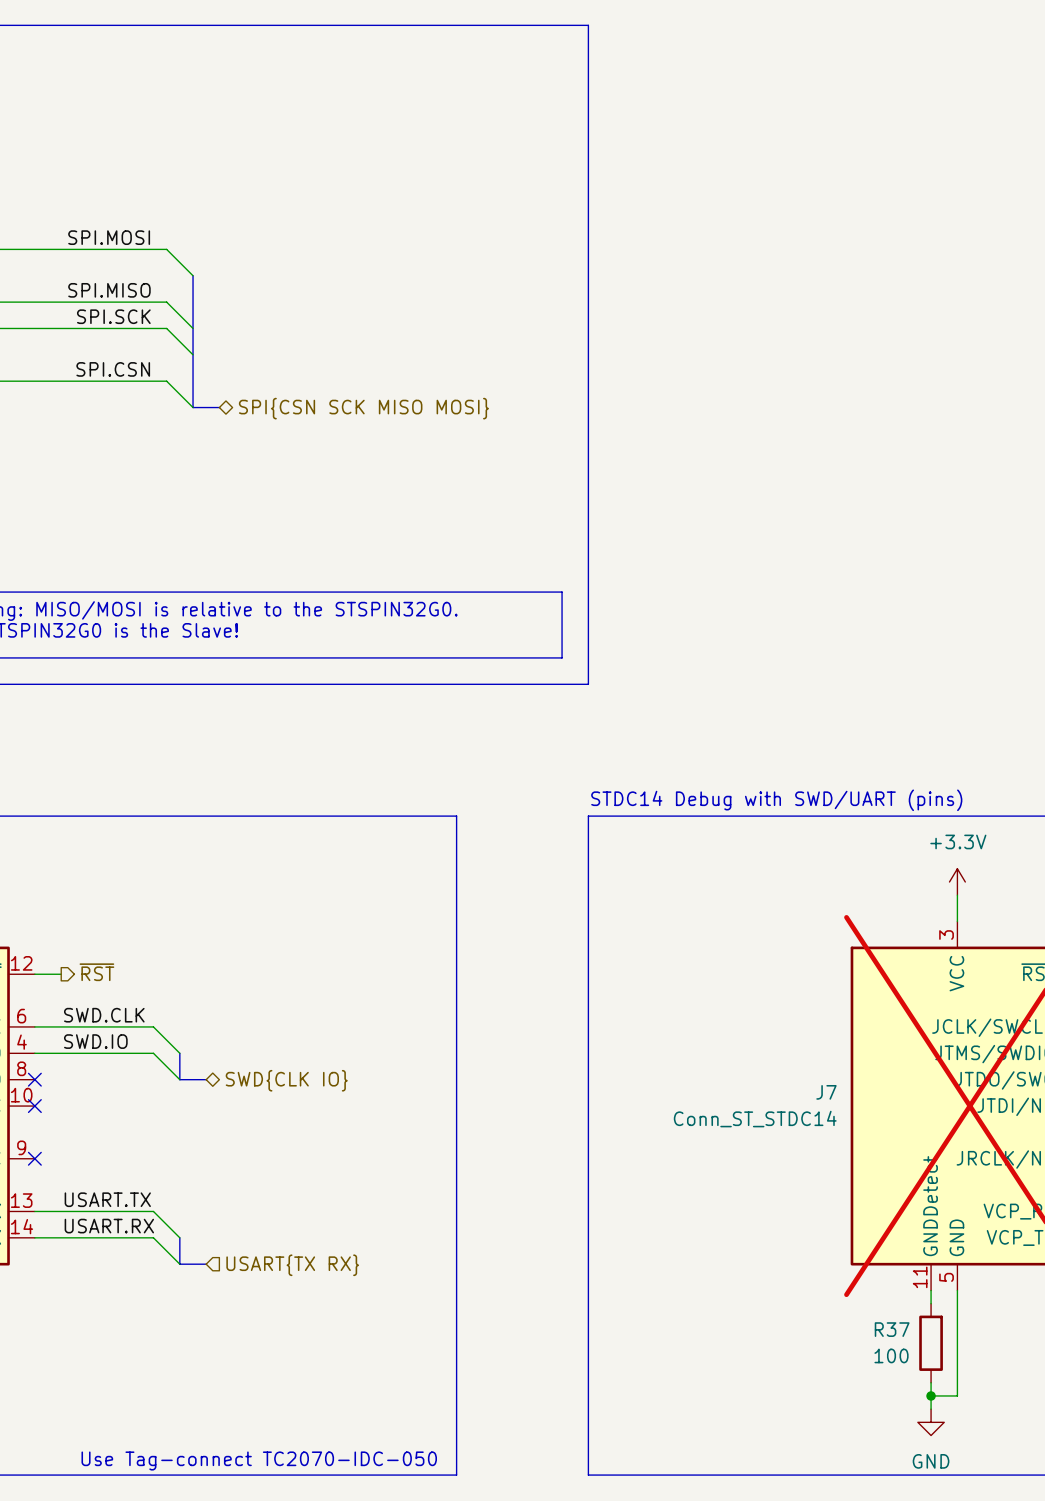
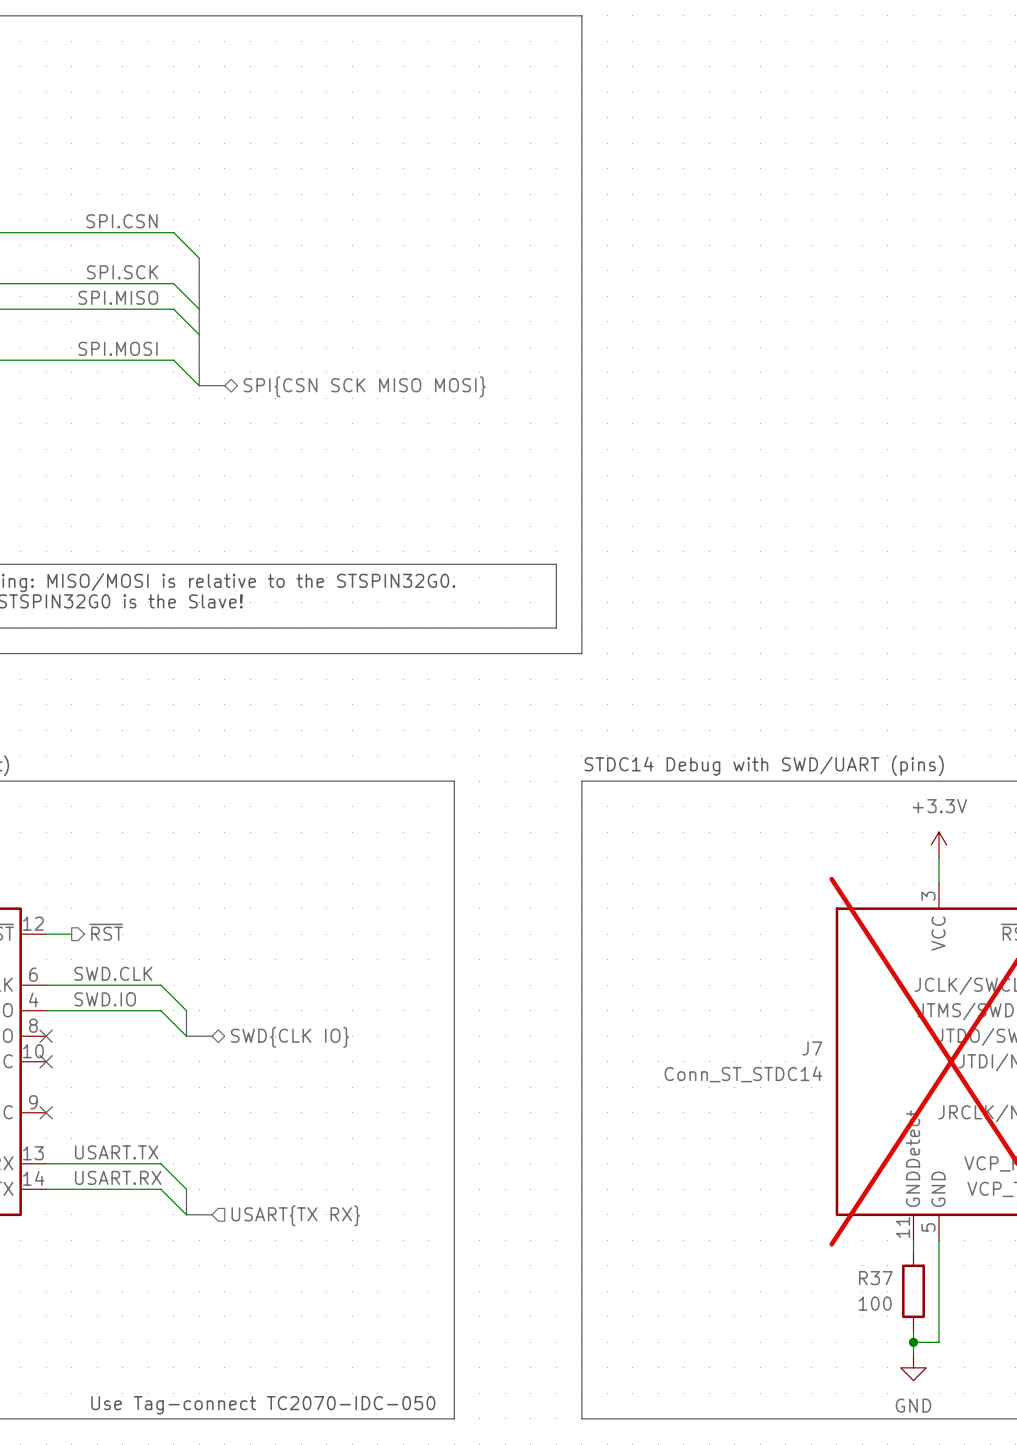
label: SPI.MOSI (109, 237) -> SPI.CSN (121, 221)
label: SPI.MISO (109, 290) -> SPI.SCK (122, 272)
label: SPI.SCK (113, 316) -> SPI.MISO (118, 297)
label: SPI.CSN (113, 369) -> SPI.MOSI (118, 348)

